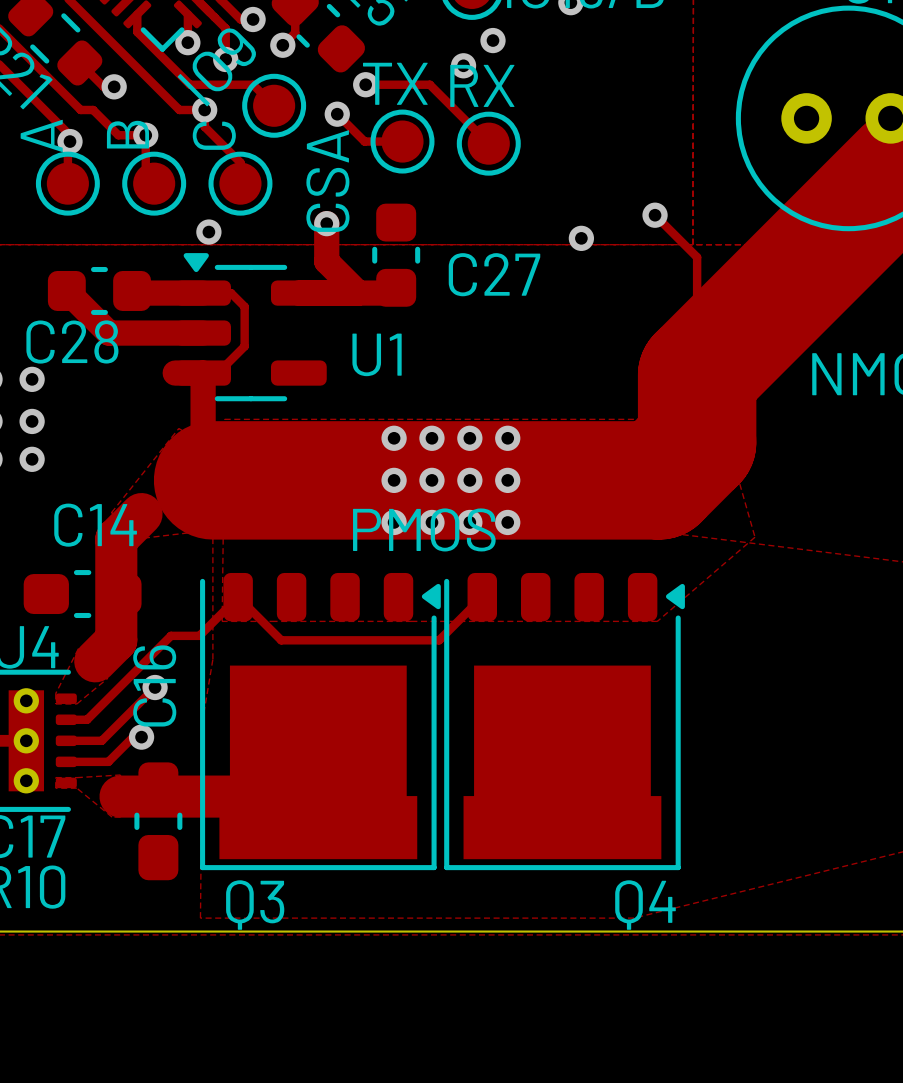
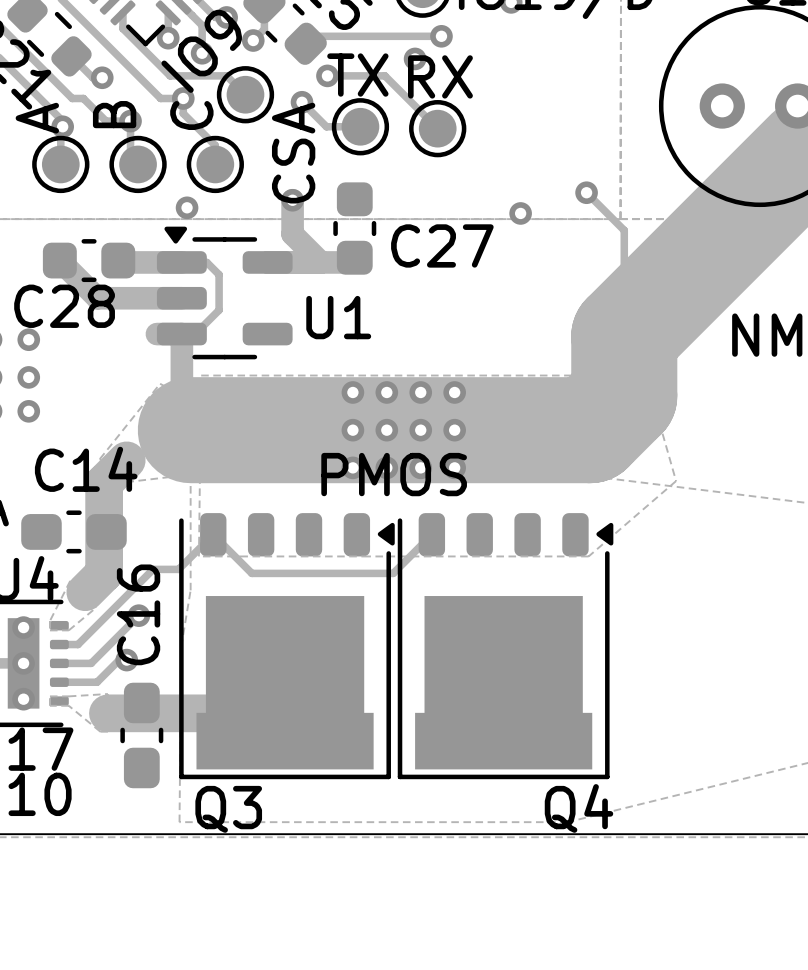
track: none -> (441, 36) (313, 36) (305, 43)

